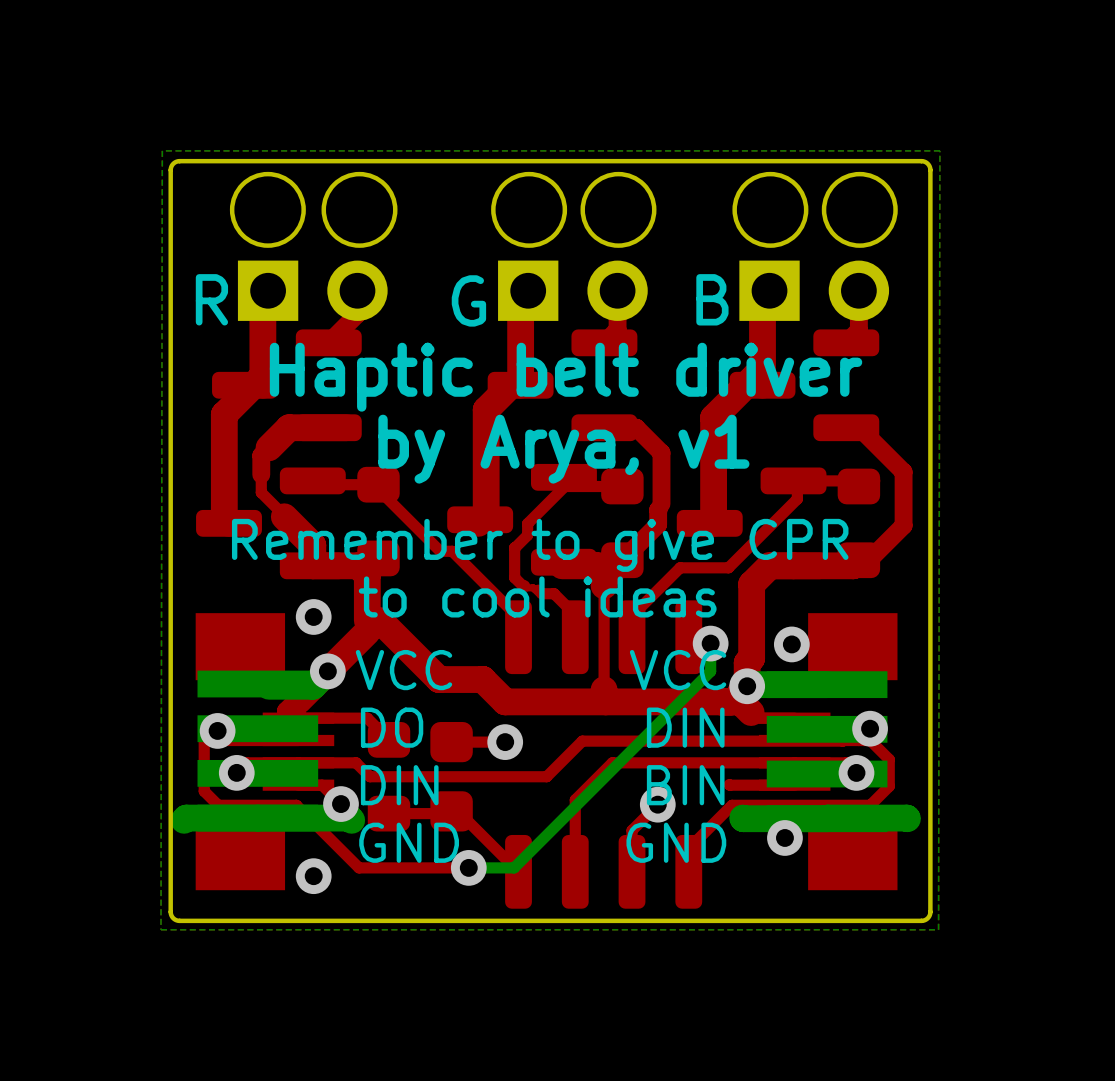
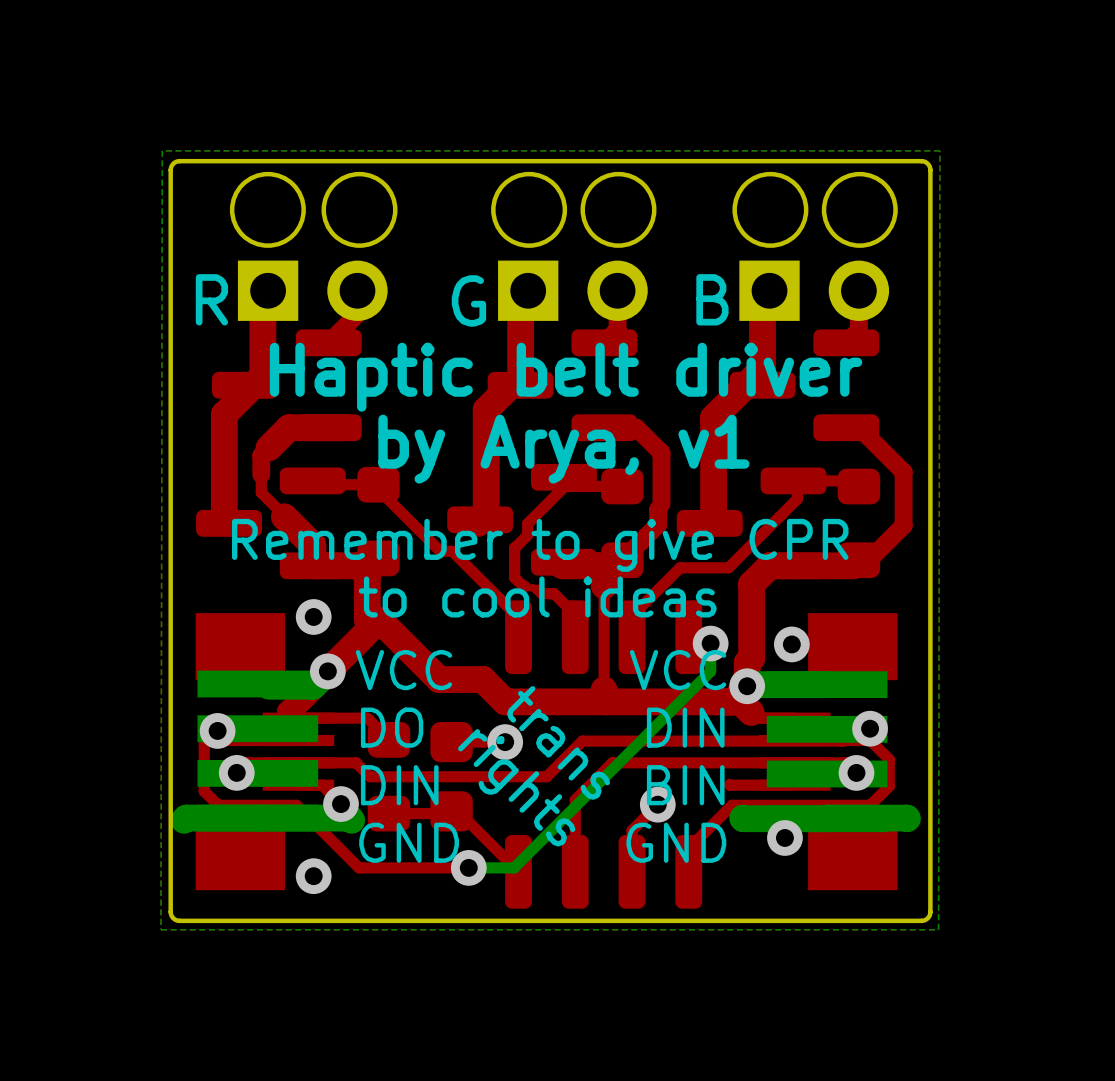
text: none -> trans (558, 742)
text: none -> rights (516, 787)

